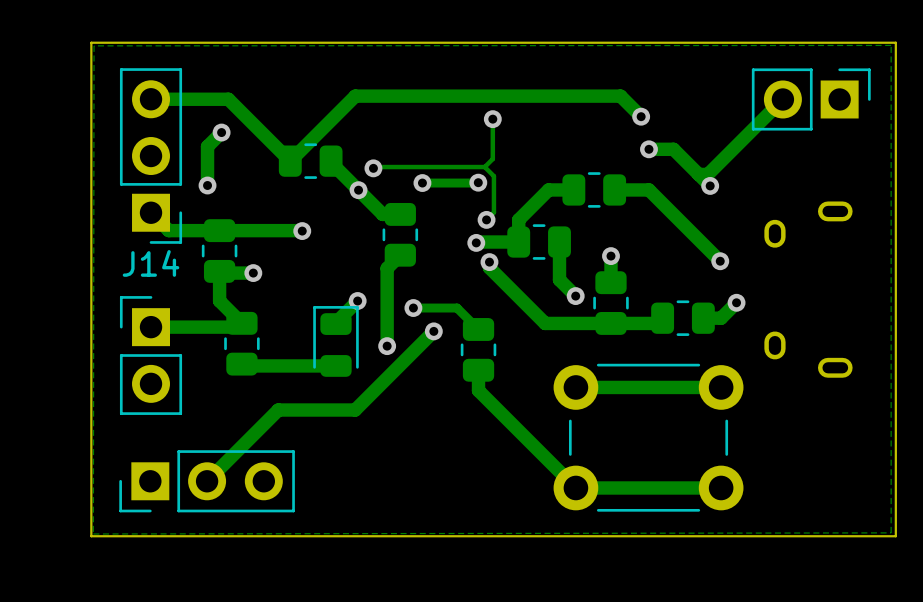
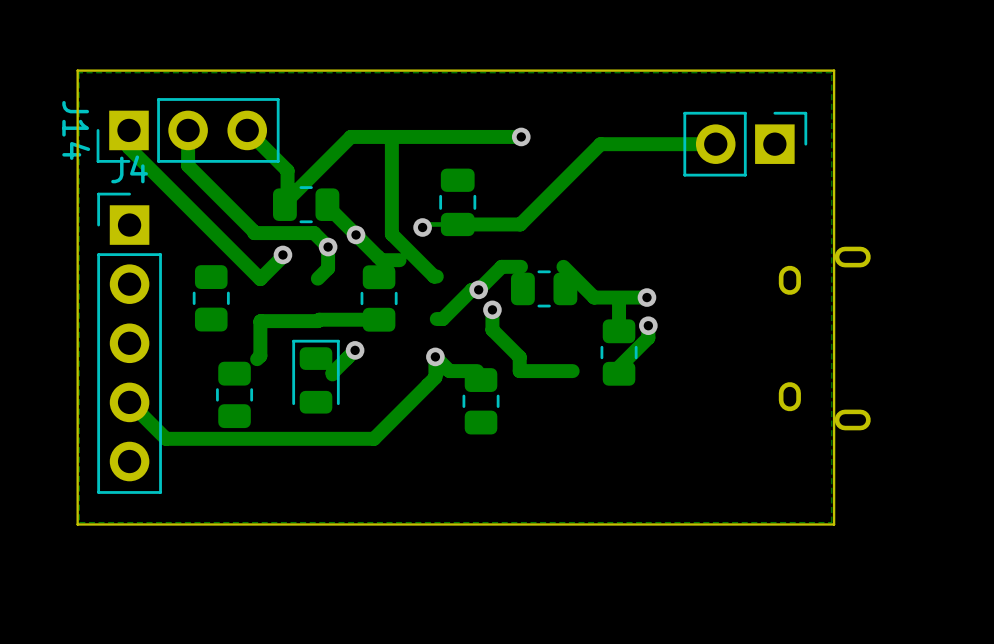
board edge: (91, 42) (895, 42) (895, 536) (91, 536) (91, 468) -> (77, 81) (77, 70) (834, 70) (834, 524) (77, 524)
zone outline: (891, 45) (891, 532) (93, 534) (94, 45) (891, 45) -> (831, 72) (831, 522) (79, 522) (79, 72) (831, 72)
track: none -> (128, 130) (128, 147) (260, 279) (282, 254)
track: none -> (188, 130) (188, 165) (254, 233) (314, 233) (328, 247) (328, 268) (317, 278)
track: (355, 96) (290, 161) (228, 99) (151, 99) -> (352, 136) (287, 200) (287, 170) (247, 130)
track: none -> (393, 136) (391, 234) (434, 276) (436, 276)
track: (517, 96) (620, 96) (641, 116) -> none
track: (782, 99) (707, 174) (698, 174) -> none
part position: (811, 99) -> (745, 144)
via: (641, 116) -> none
track: (492, 119) (492, 159) (484, 167) -> none
via position: (492, 119) -> (521, 136)
track: (221, 132) (207, 146) (207, 185) -> none
via: (221, 132) -> none
track: (648, 149) (673, 149) (710, 185) -> none
via: (648, 149) -> none
J14 rotation: 0° (151, 156) -> 90° clockwise (188, 130)
part: none -> (457, 202)
track: (484, 167) (493, 176) (493, 212) (486, 219) -> none
track: (484, 167) (373, 168) -> none
via: (373, 168) -> none
track: (478, 182) (422, 183) -> (715, 144) (600, 144) (520, 224) (425, 224) (422, 227)
via: (478, 182) -> none
via: (207, 185) -> none
via: (710, 185) -> none
track: (573, 189) (548, 189) (518, 219) (518, 242) (477, 242) -> (520, 266) (501, 266) (479, 288)
part: (594, 189) -> none
track: (614, 189) (648, 189) (720, 261) -> none
via: none -> (328, 247)
via: none -> (282, 254)
track: (151, 212) (168, 230) (301, 230) -> none
via: (486, 219) -> none
track: none -> (563, 266) (594, 297) (646, 297)
via: (302, 231) -> none
part position: (400, 234) -> (379, 298)
track: (559, 242) (559, 279) (575, 296) -> none
track: none -> (478, 291) (471, 289) (442, 319) (436, 319)
via: none -> (646, 297)
track: (400, 255) (387, 268) (387, 346) -> none
via: (611, 256) -> none
via: (720, 261) -> none
track: (489, 267) (545, 323) (657, 323) (662, 318) -> (492, 315) (492, 329) (519, 357) (519, 371) (572, 371)
track: none -> (379, 319) (260, 321) (260, 355) (257, 359)
track: (253, 273) (221, 273) (219, 271) (219, 300) (241, 323) (238, 327) (151, 327) -> none
via: (253, 273) -> none
track: none -> (648, 325) (648, 337) (615, 371)
via: none -> (648, 325)
J4: none -> (129, 343)
via: (575, 296) -> none
track: (736, 302) (721, 318) (703, 318) -> none
via: (736, 302) -> none
via: none -> (435, 356)
track: (413, 308) (457, 308) (478, 329) -> none
via: (413, 308) -> none
part: (682, 318) -> none
track: none -> (477, 371) (449, 371) (435, 356) (435, 377) (374, 438) (165, 438) (129, 402)
track: (433, 331) (355, 410) (278, 410) (207, 481) -> none
via: (433, 331) -> none
part position: (335, 341) -> (316, 376)
via: (387, 346) -> none
part: (151, 355) -> none
track: (241, 364) (243, 365) (335, 365) -> none
track: (478, 370) (478, 390) (575, 487) (721, 487) -> none
track: (721, 387) (575, 387) -> none
part: (648, 437) -> none
part: (207, 481) -> none

